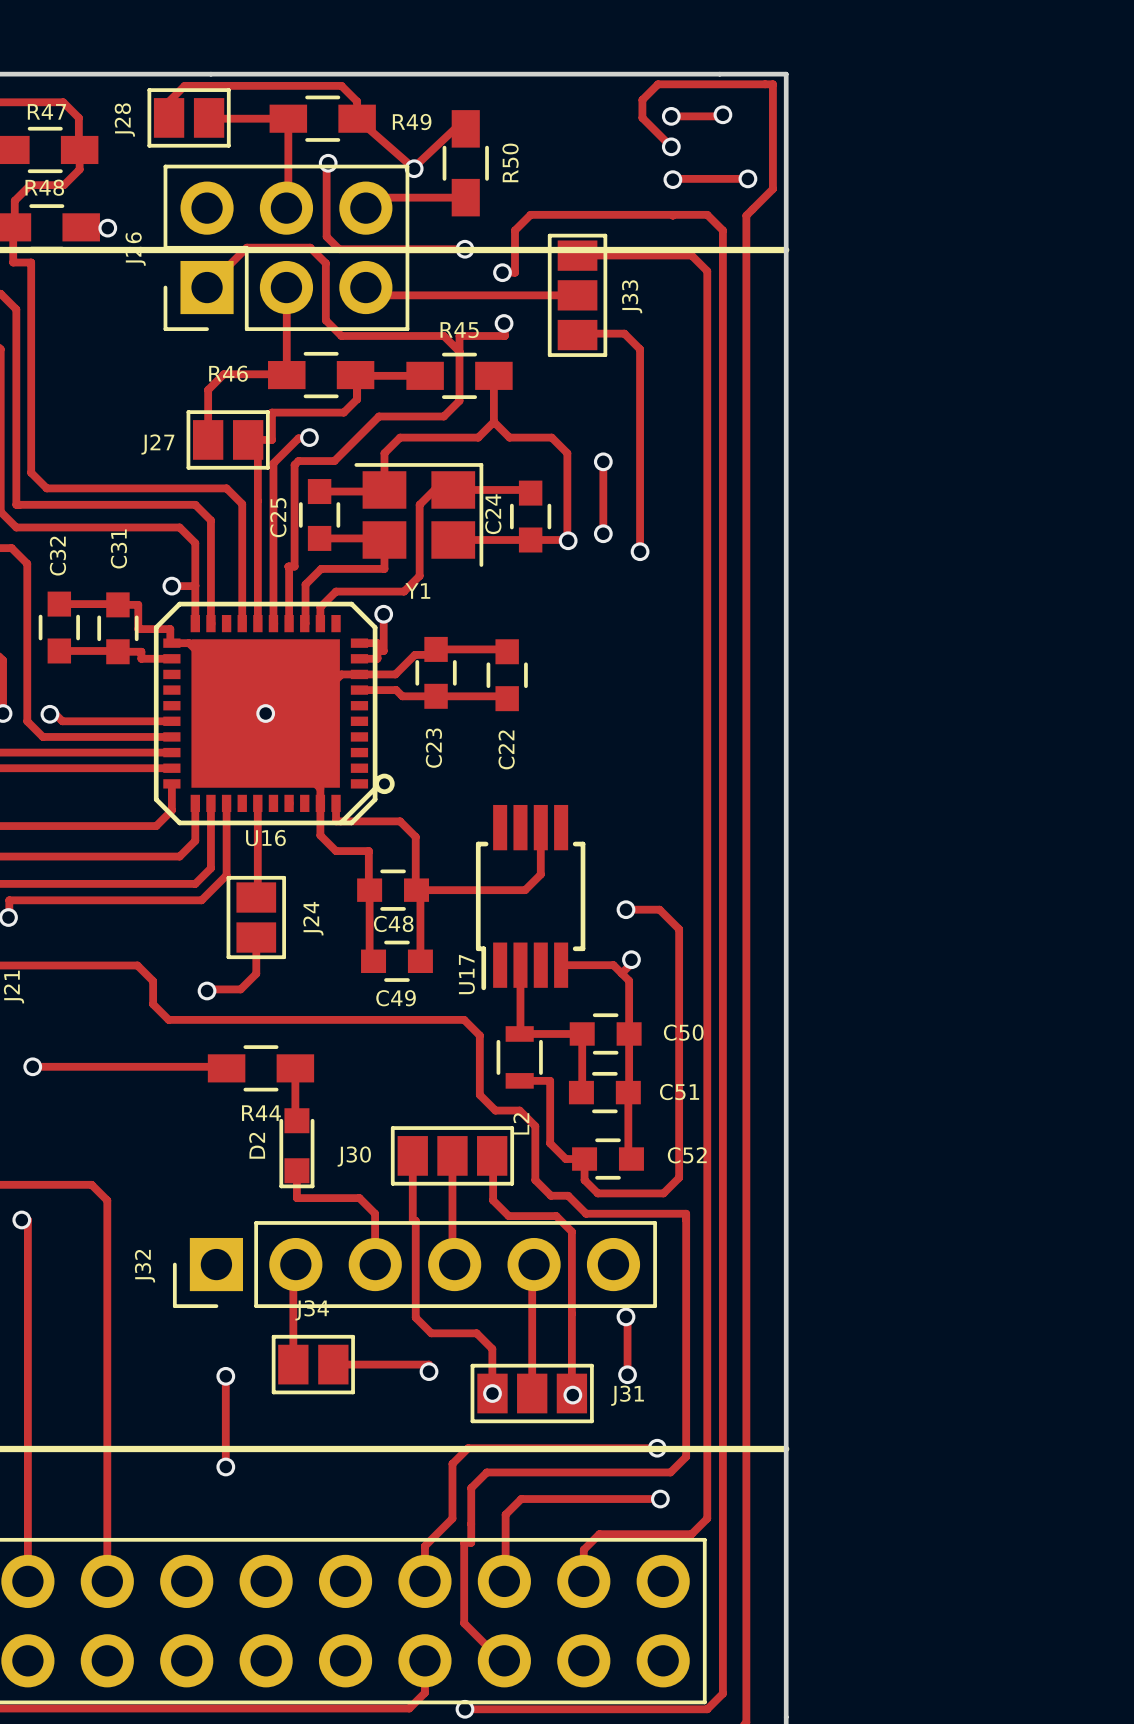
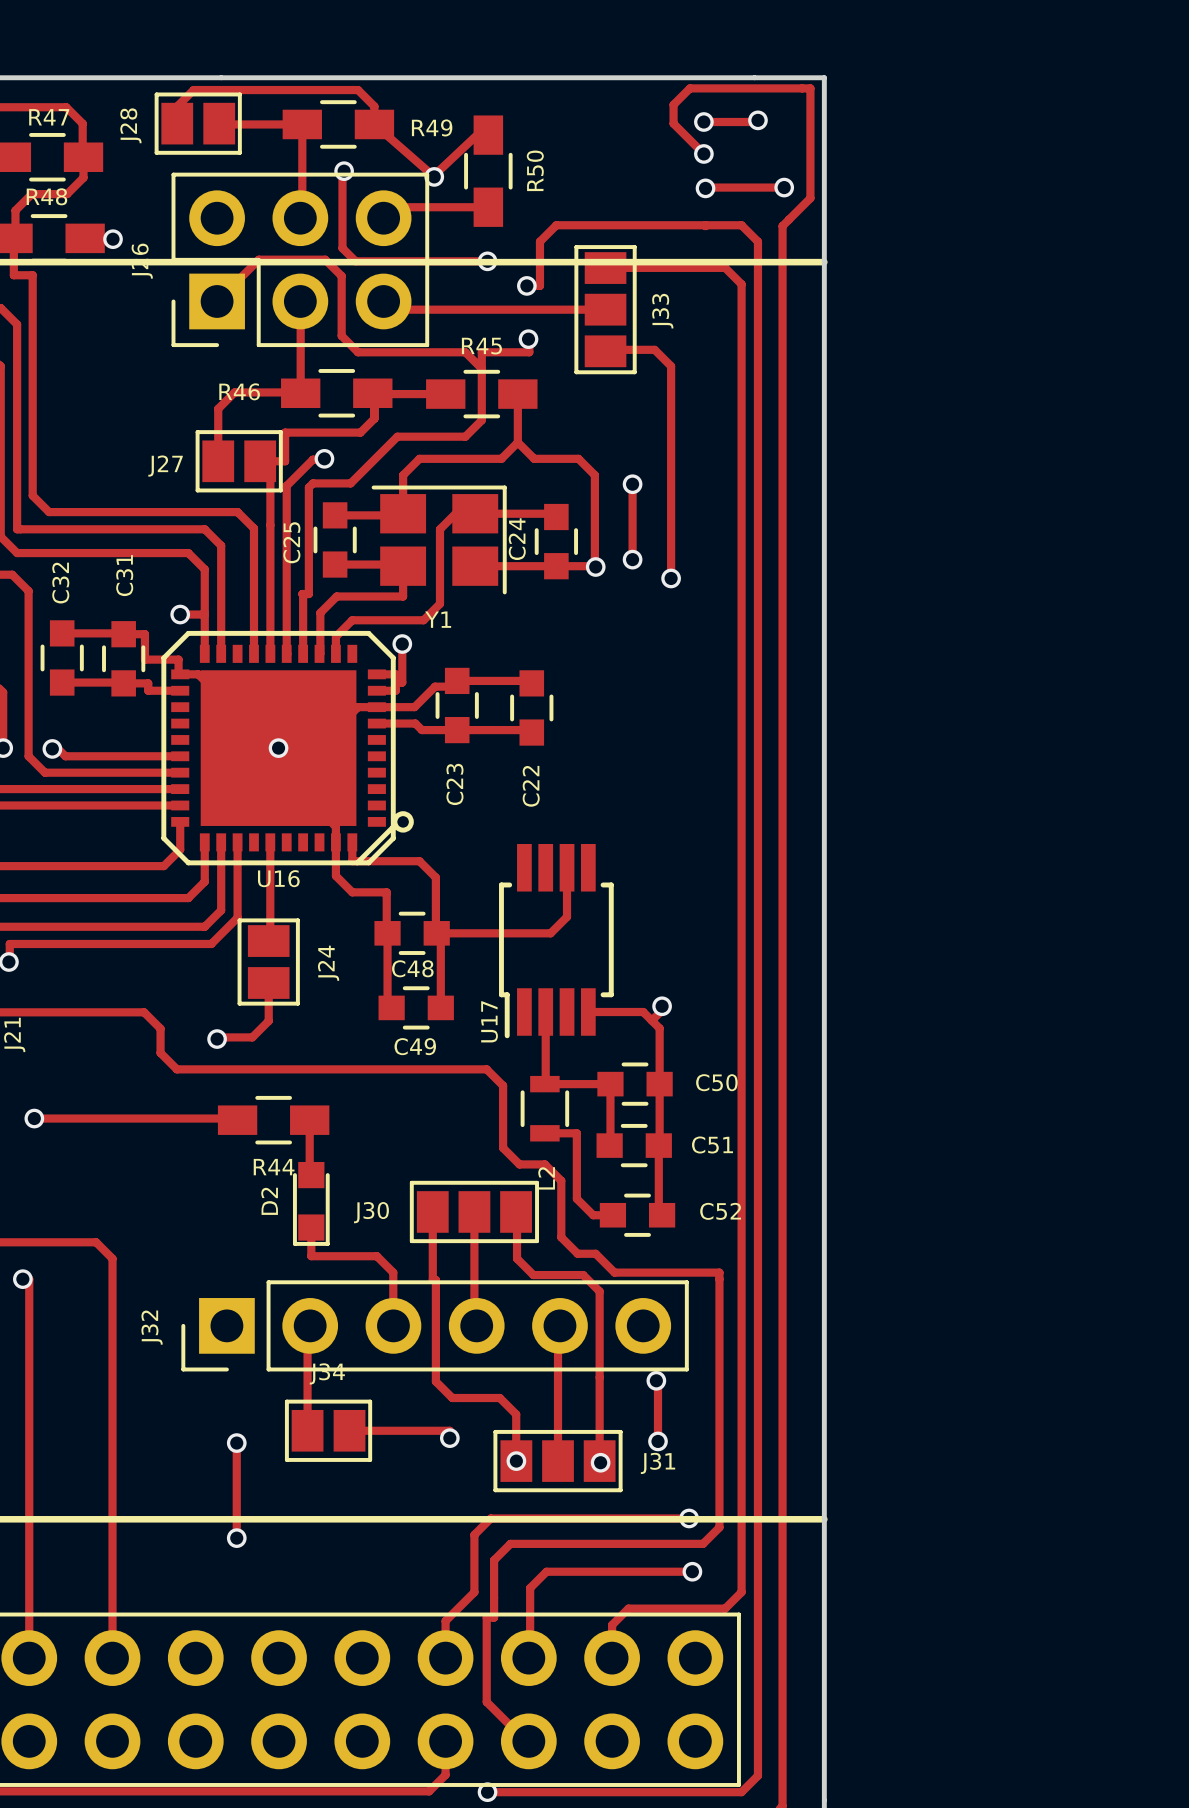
track: (625, 909) (659, 909) (679, 929) (679, 1177) (663, 1193) (597, 1193) (584, 1180) (584, 1159) -> none
via: (625, 909) -> none

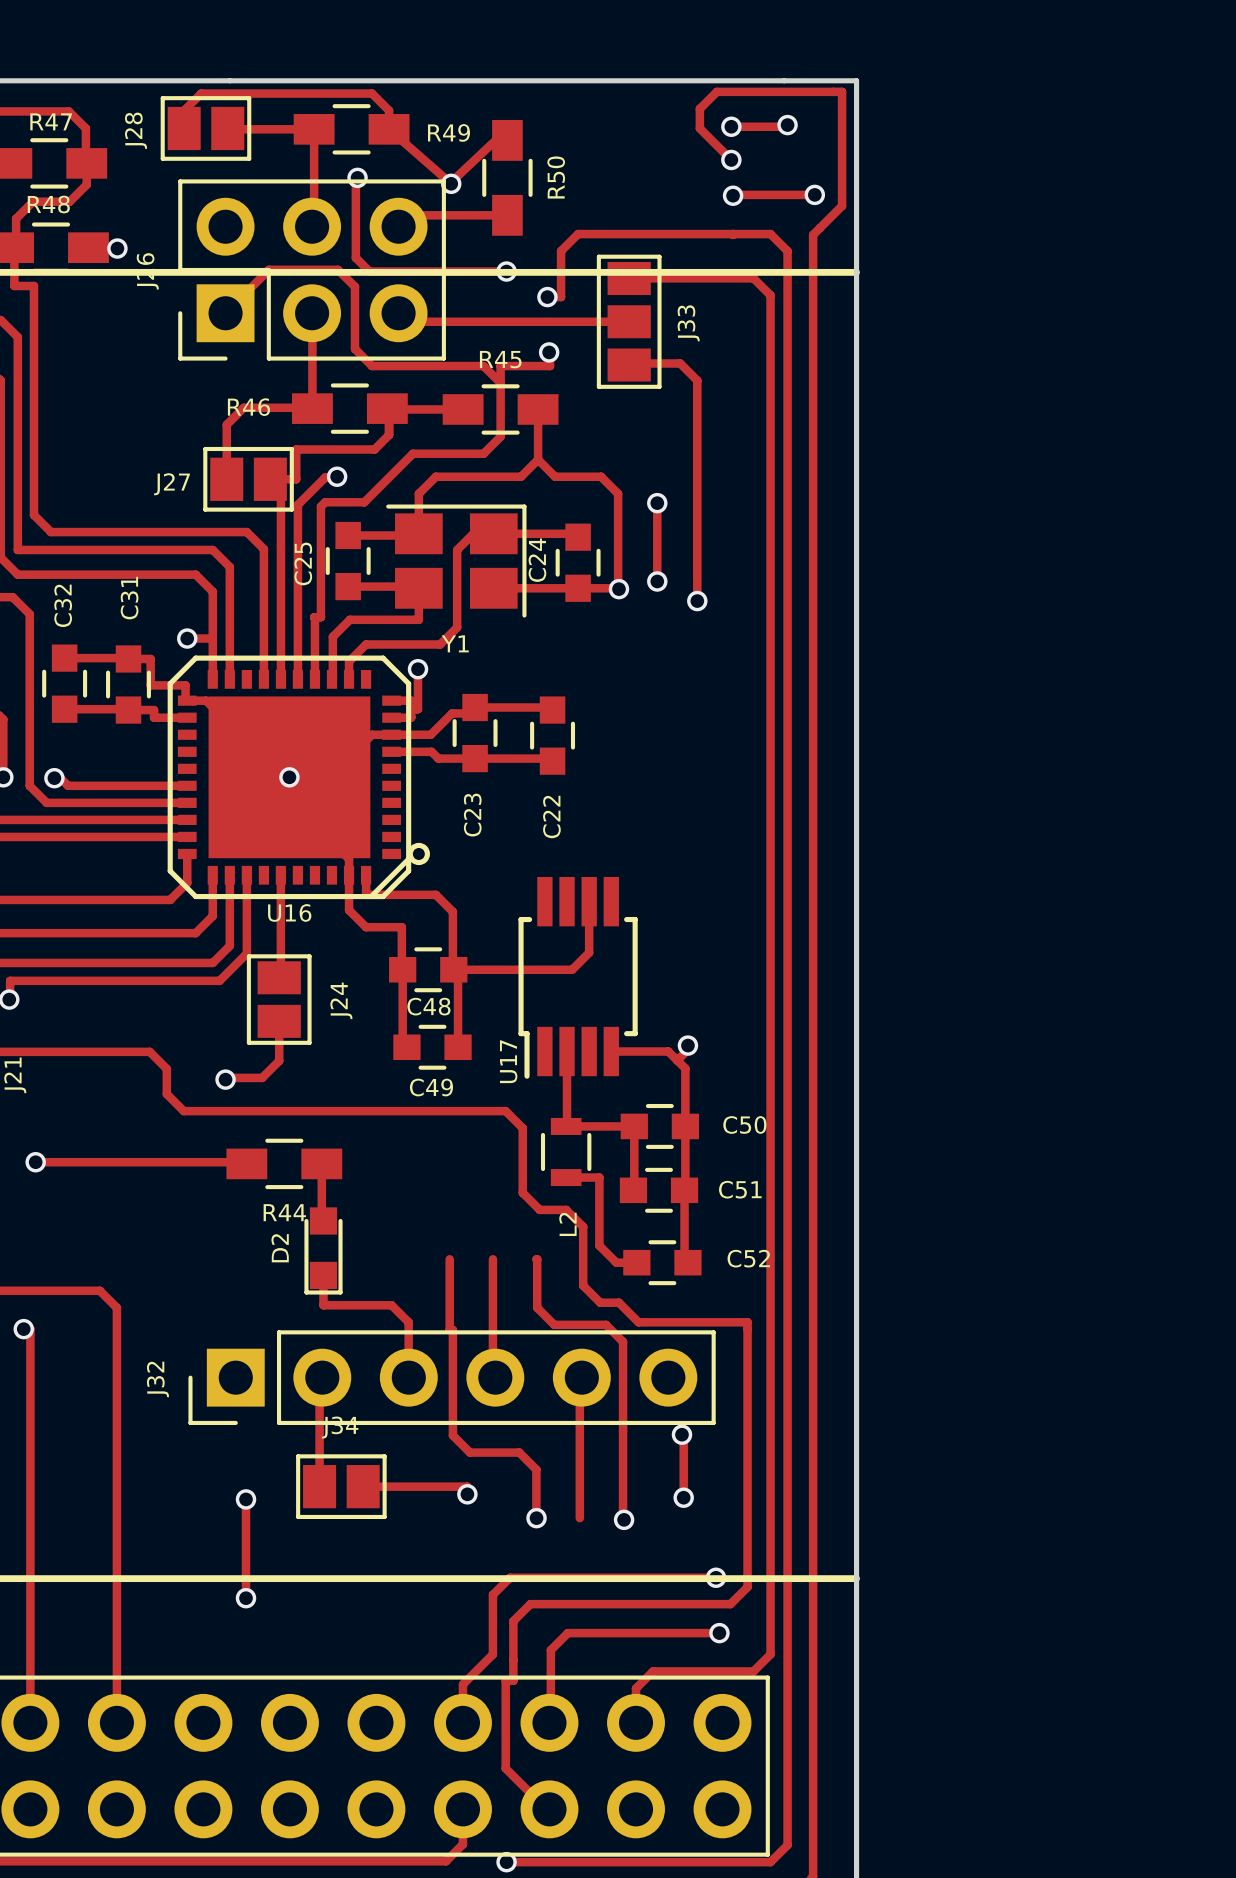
J30: (474, 1211) -> none
J31: (558, 1461) -> none

